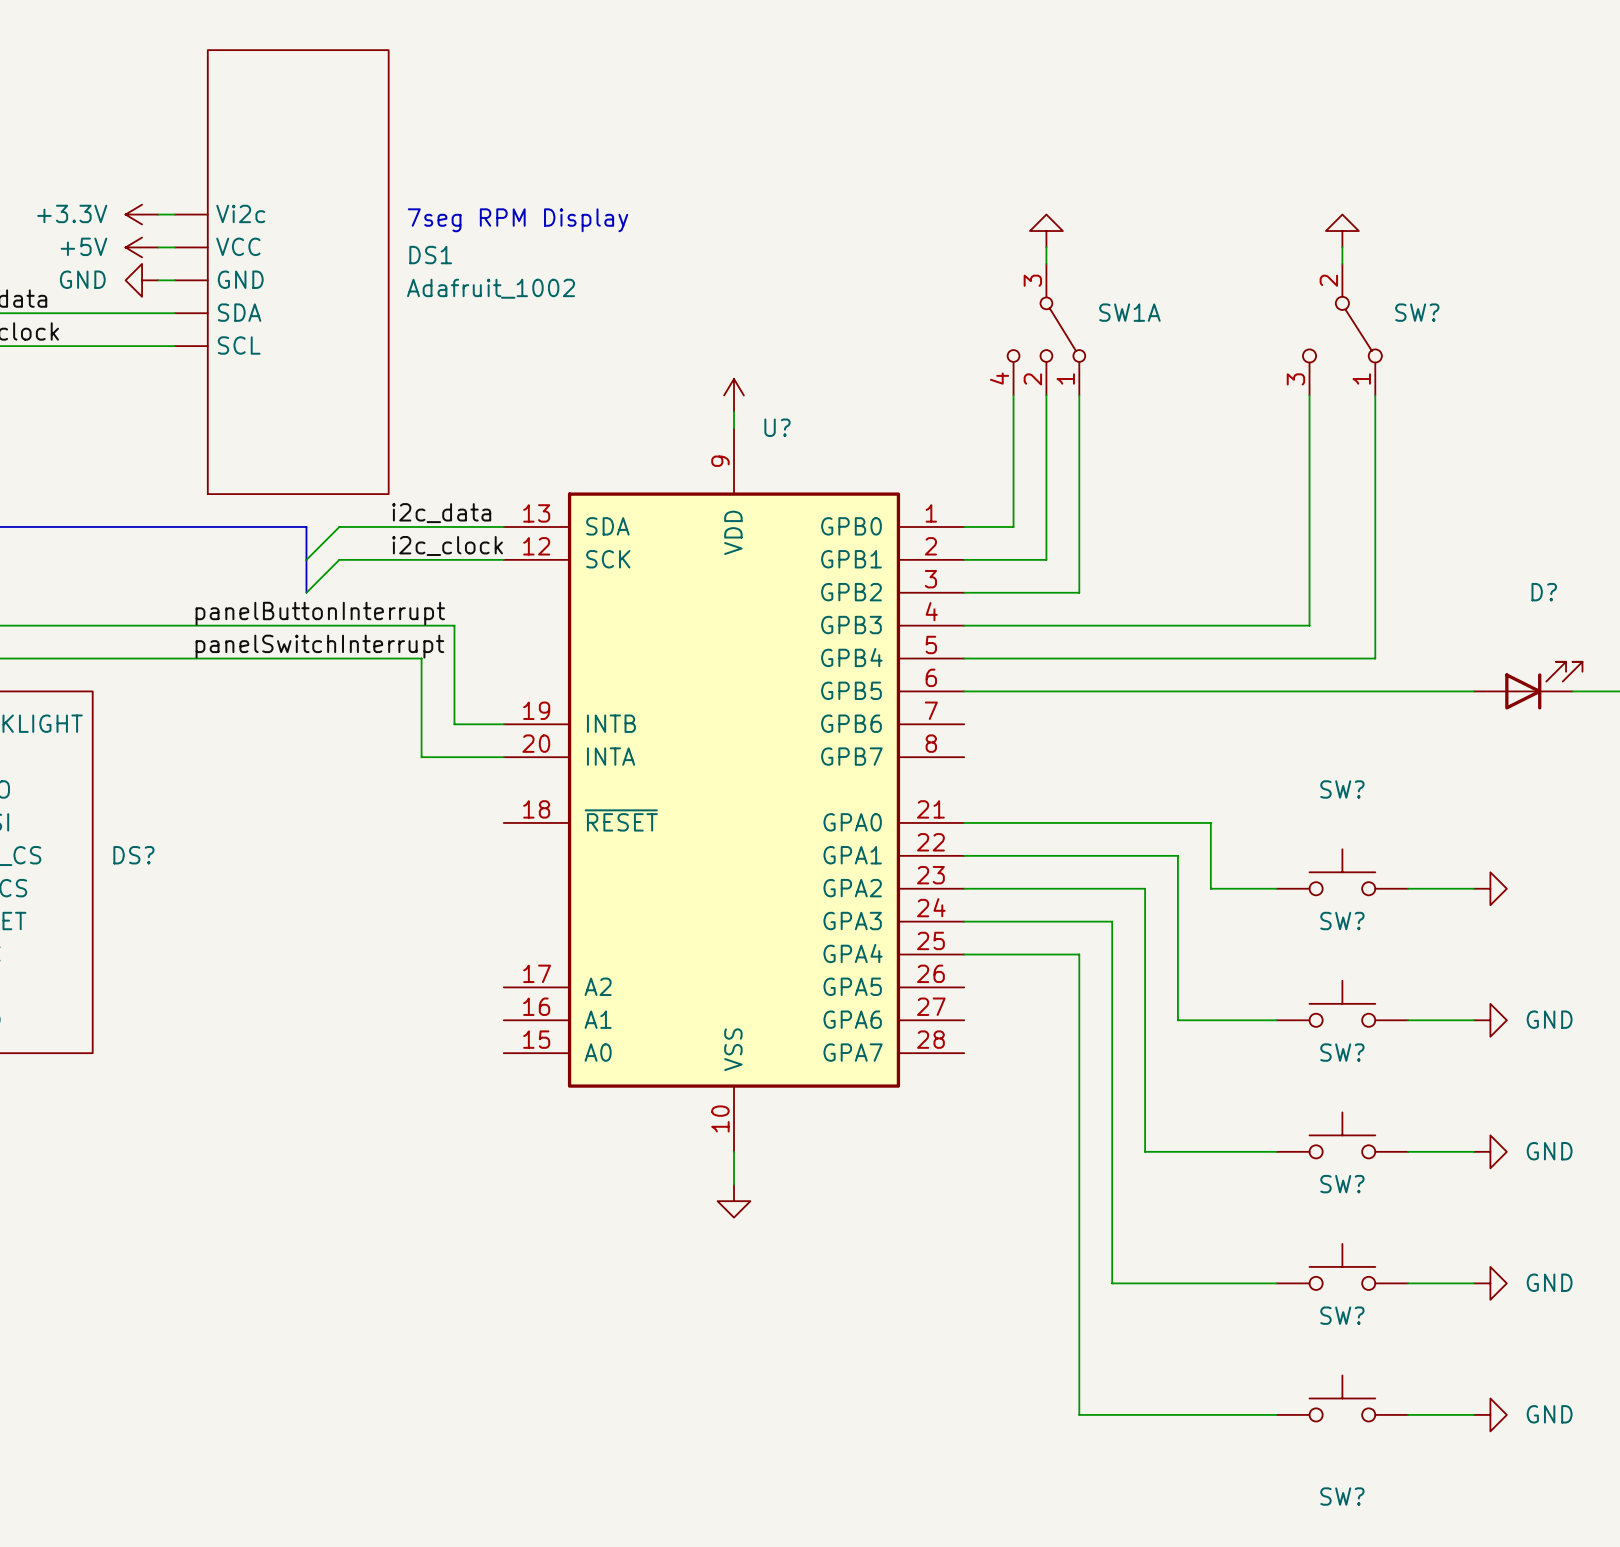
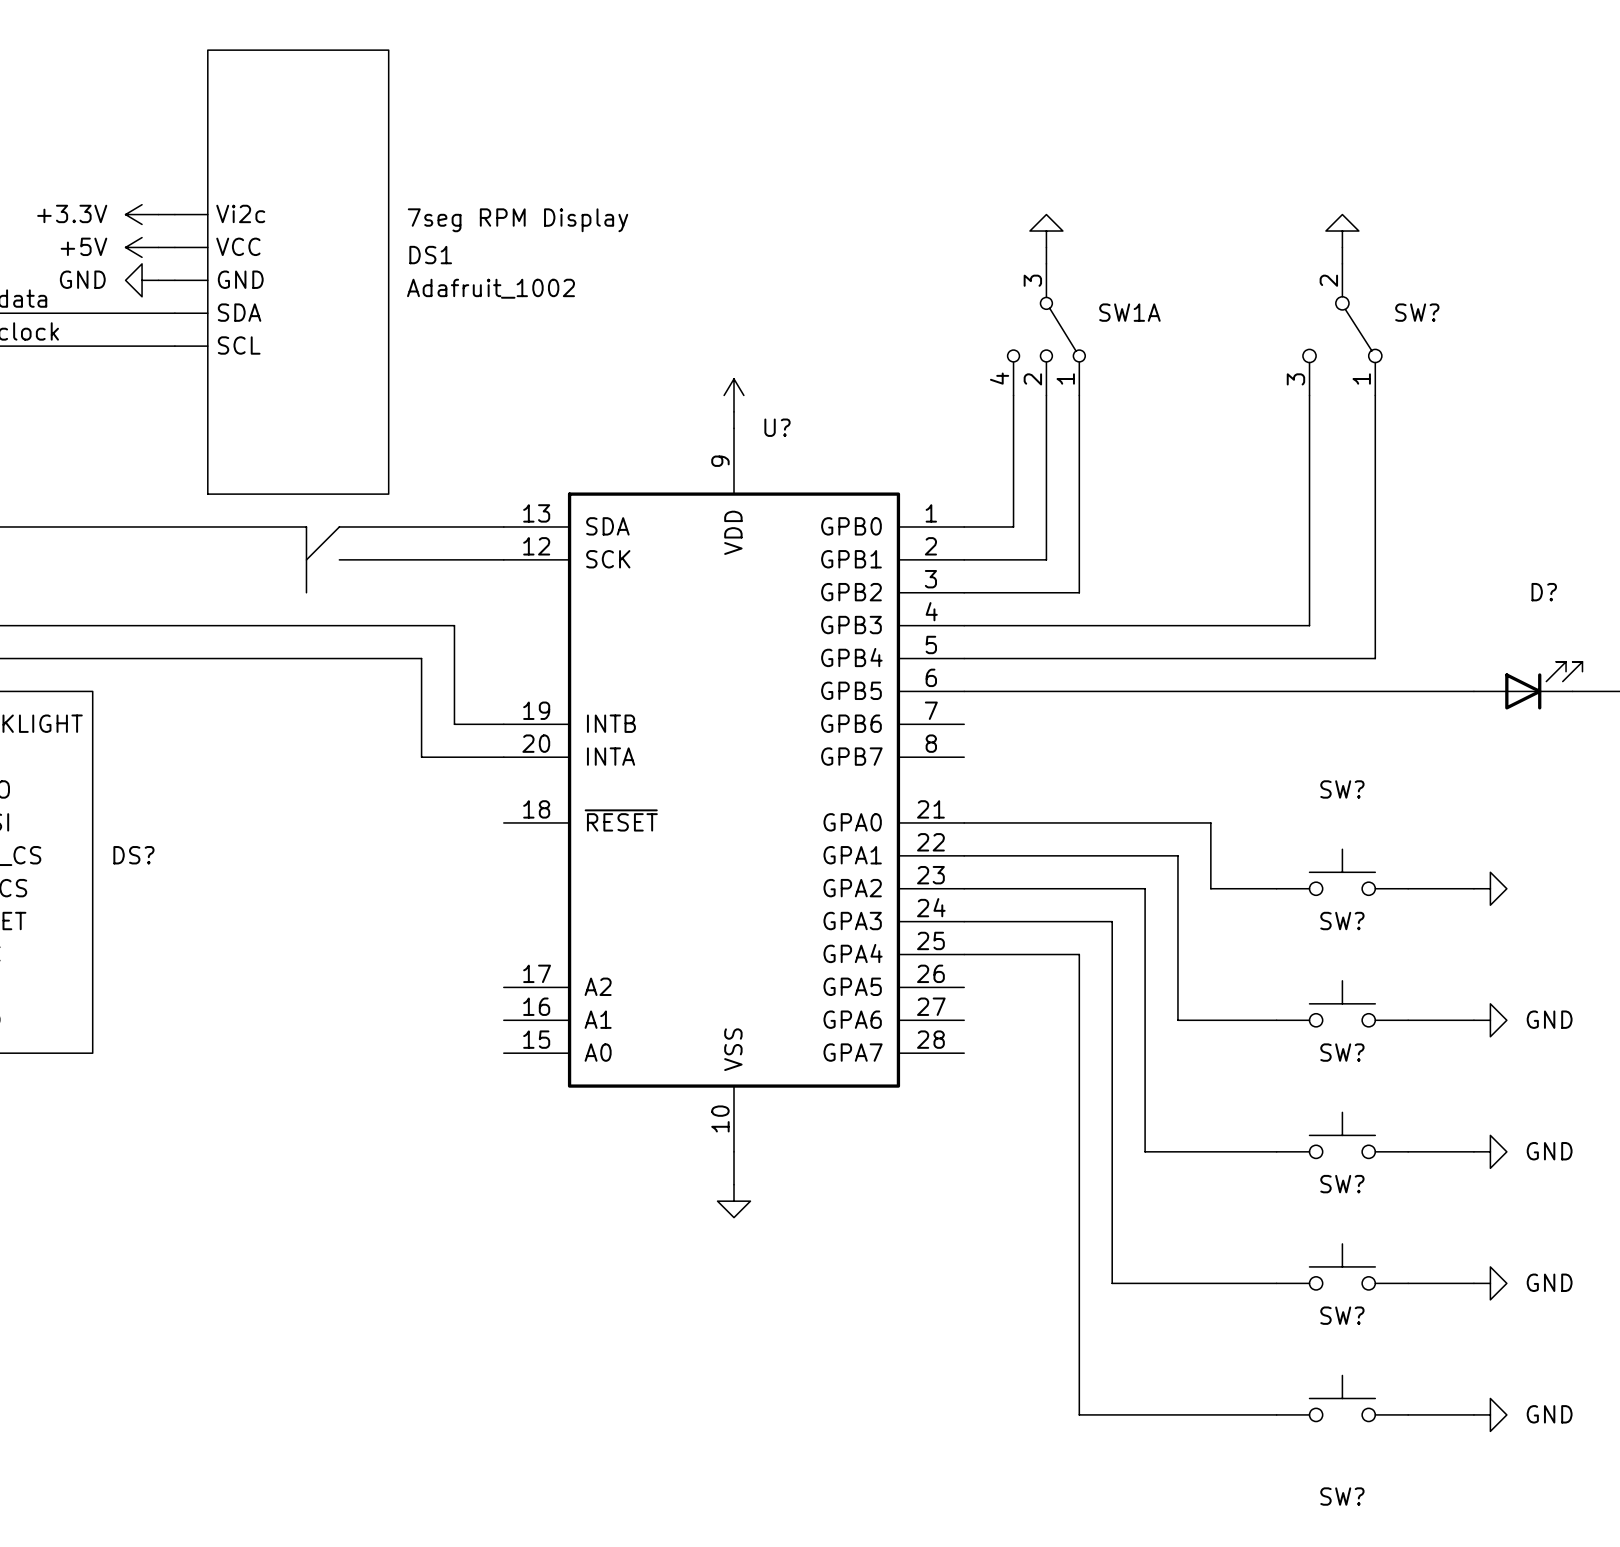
label: i2c_data (441, 513) -> none
label: i2c_clock (447, 545) -> none
wire: (339, 559) (306, 592) -> none
label: panelButtonInterrupt (320, 613) -> none
label: panelSwitchInterrupt (319, 646) -> none

